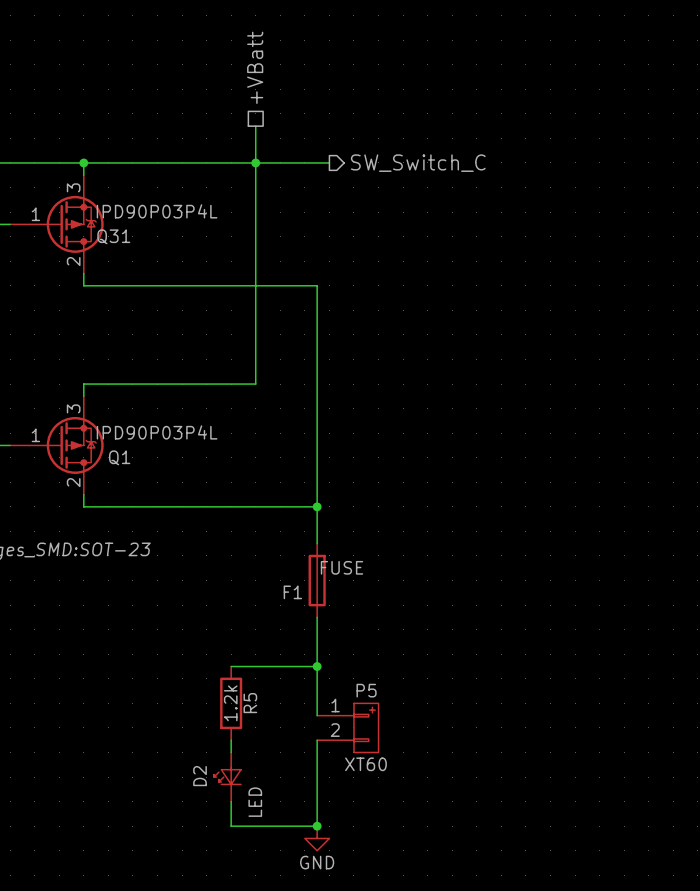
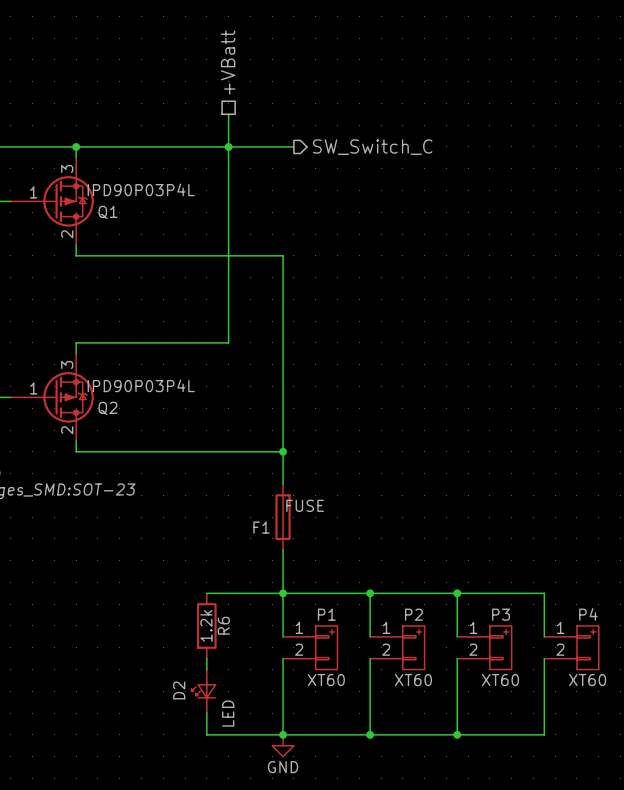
Q31 name: Q31 (113, 236) -> Q1 (107, 212)
Q1 name: Q1 (119, 457) -> Q2 (107, 408)
wire: none -> (283, 593) (544, 593) (544, 636)
wire: none -> (370, 593) (370, 636)
junction: none -> (370, 593)
wire: none -> (457, 593) (457, 636)
junction: none -> (457, 593)
P5 name: P5 (366, 690) -> P1 (326, 614)
R5 name: R5 (250, 703) -> R6 (223, 625)
P2: none -> XT60 (397, 647)
P3: none -> XT60 (484, 647)
P4: none -> XT60 (571, 647)
wire: none -> (370, 658) (370, 734)
wire: none -> (457, 658) (457, 734)
wire: none -> (544, 658) (544, 734) (283, 734)
junction: none -> (370, 734)
junction: none -> (457, 734)

